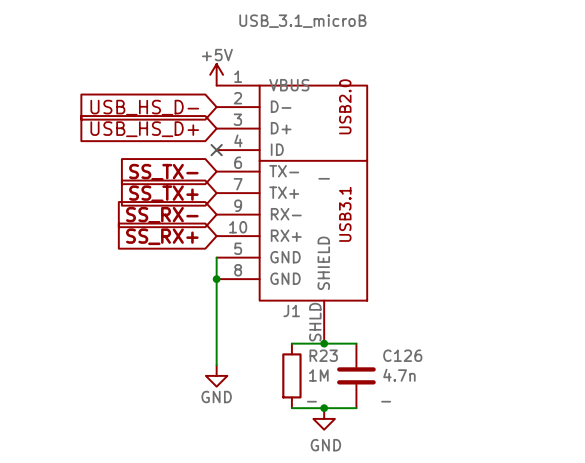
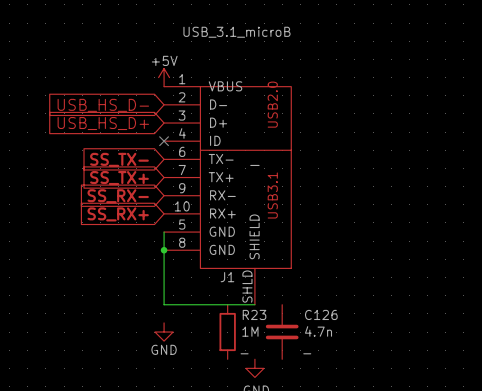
wire: (216, 343) (216, 365) -> (164, 304) (227, 304)
wire: (324, 343) (356, 343) -> none
junction: (324, 343) -> none
wire: (291, 408) (356, 408) -> none
junction: (324, 408) -> none

